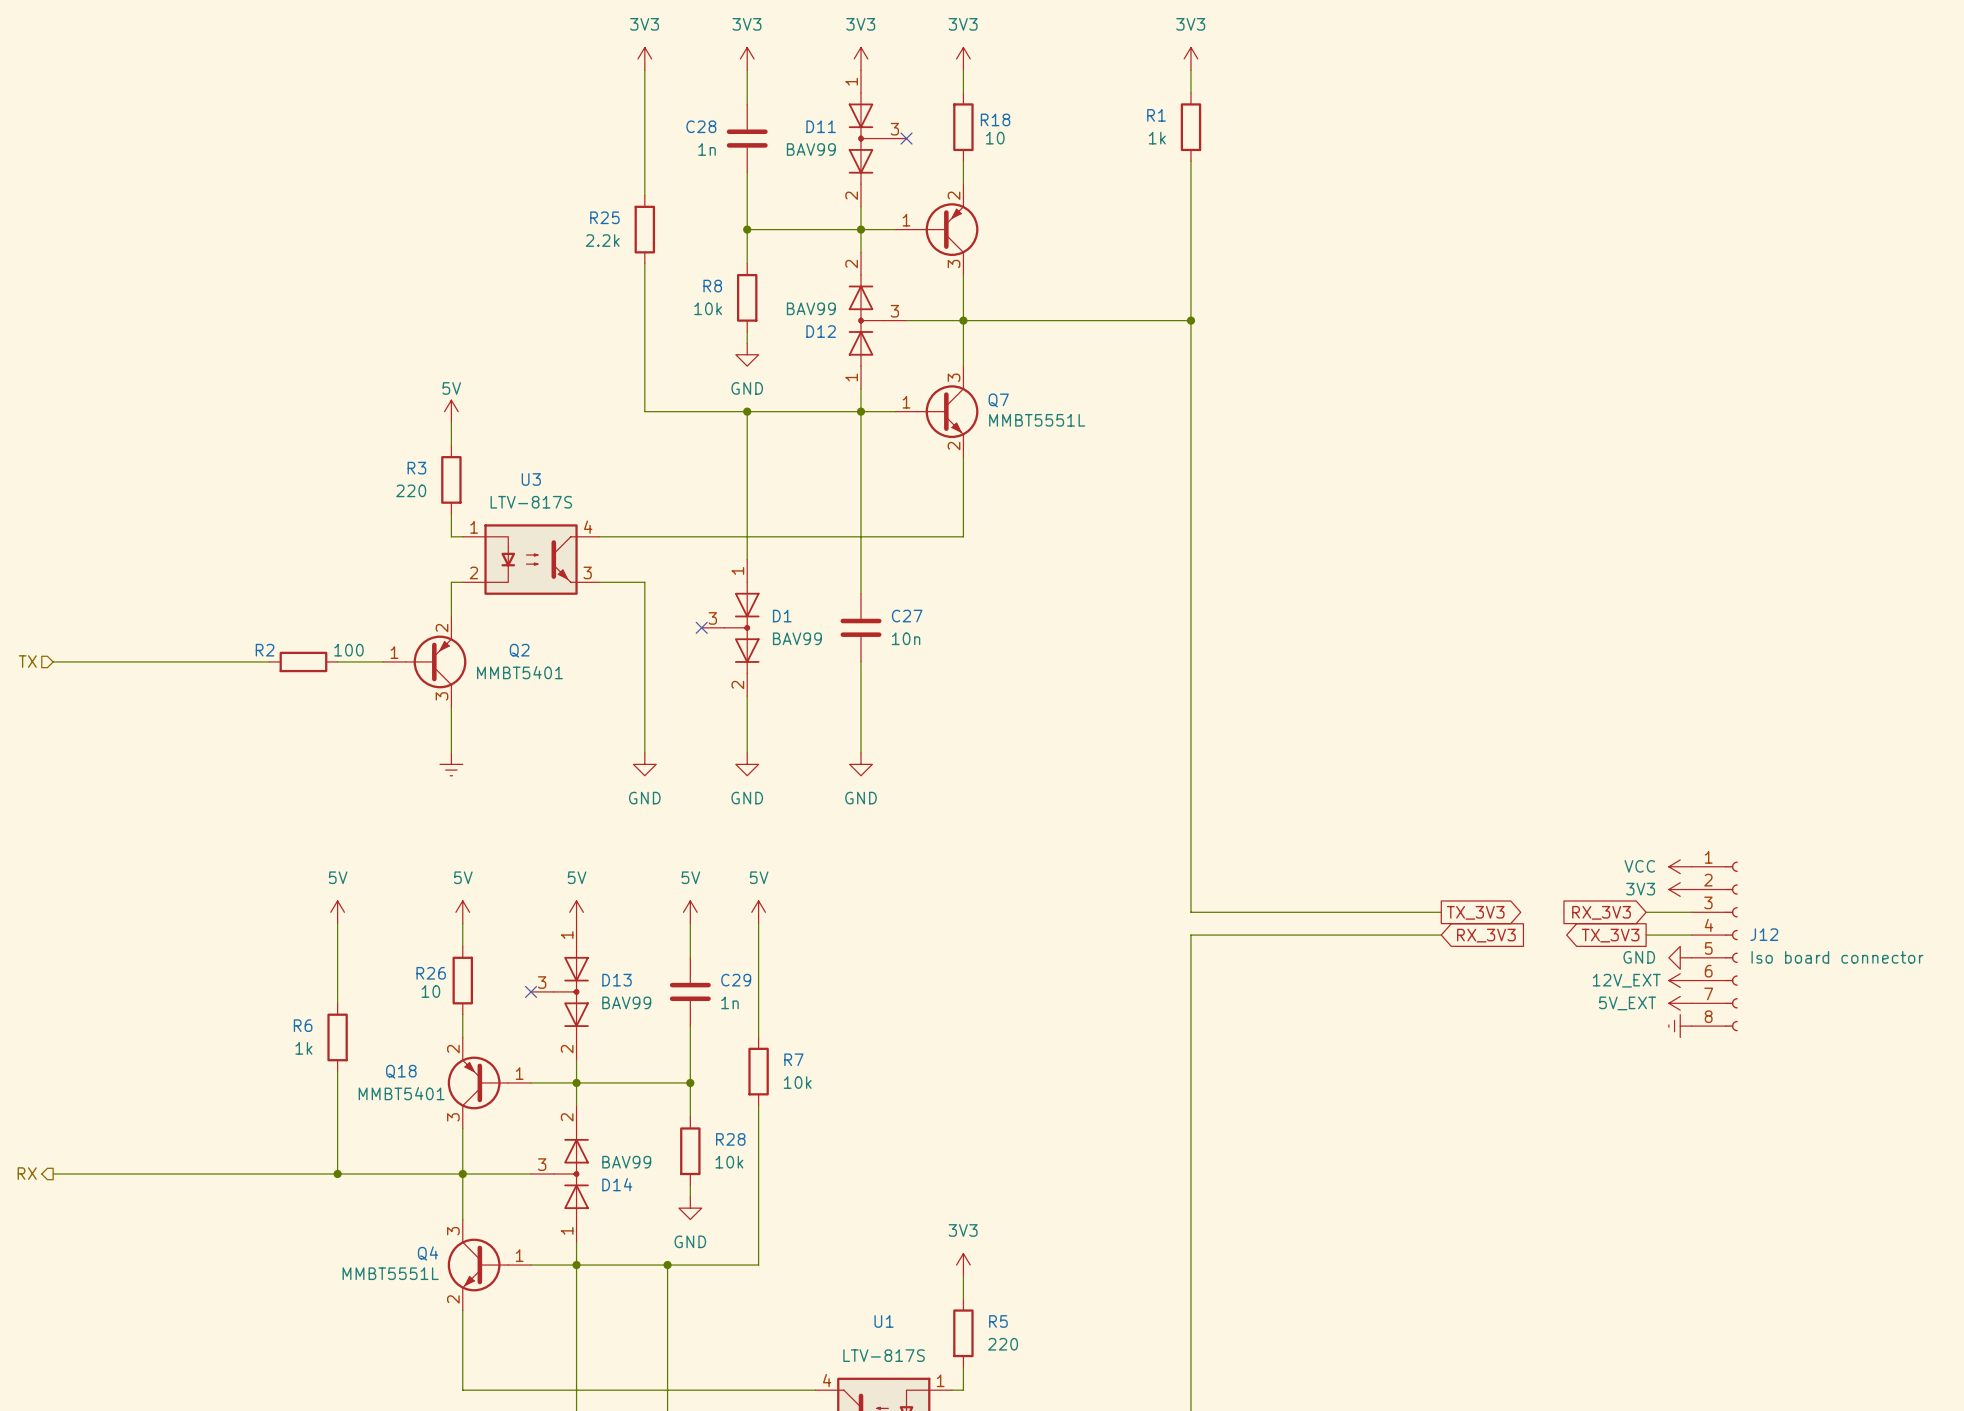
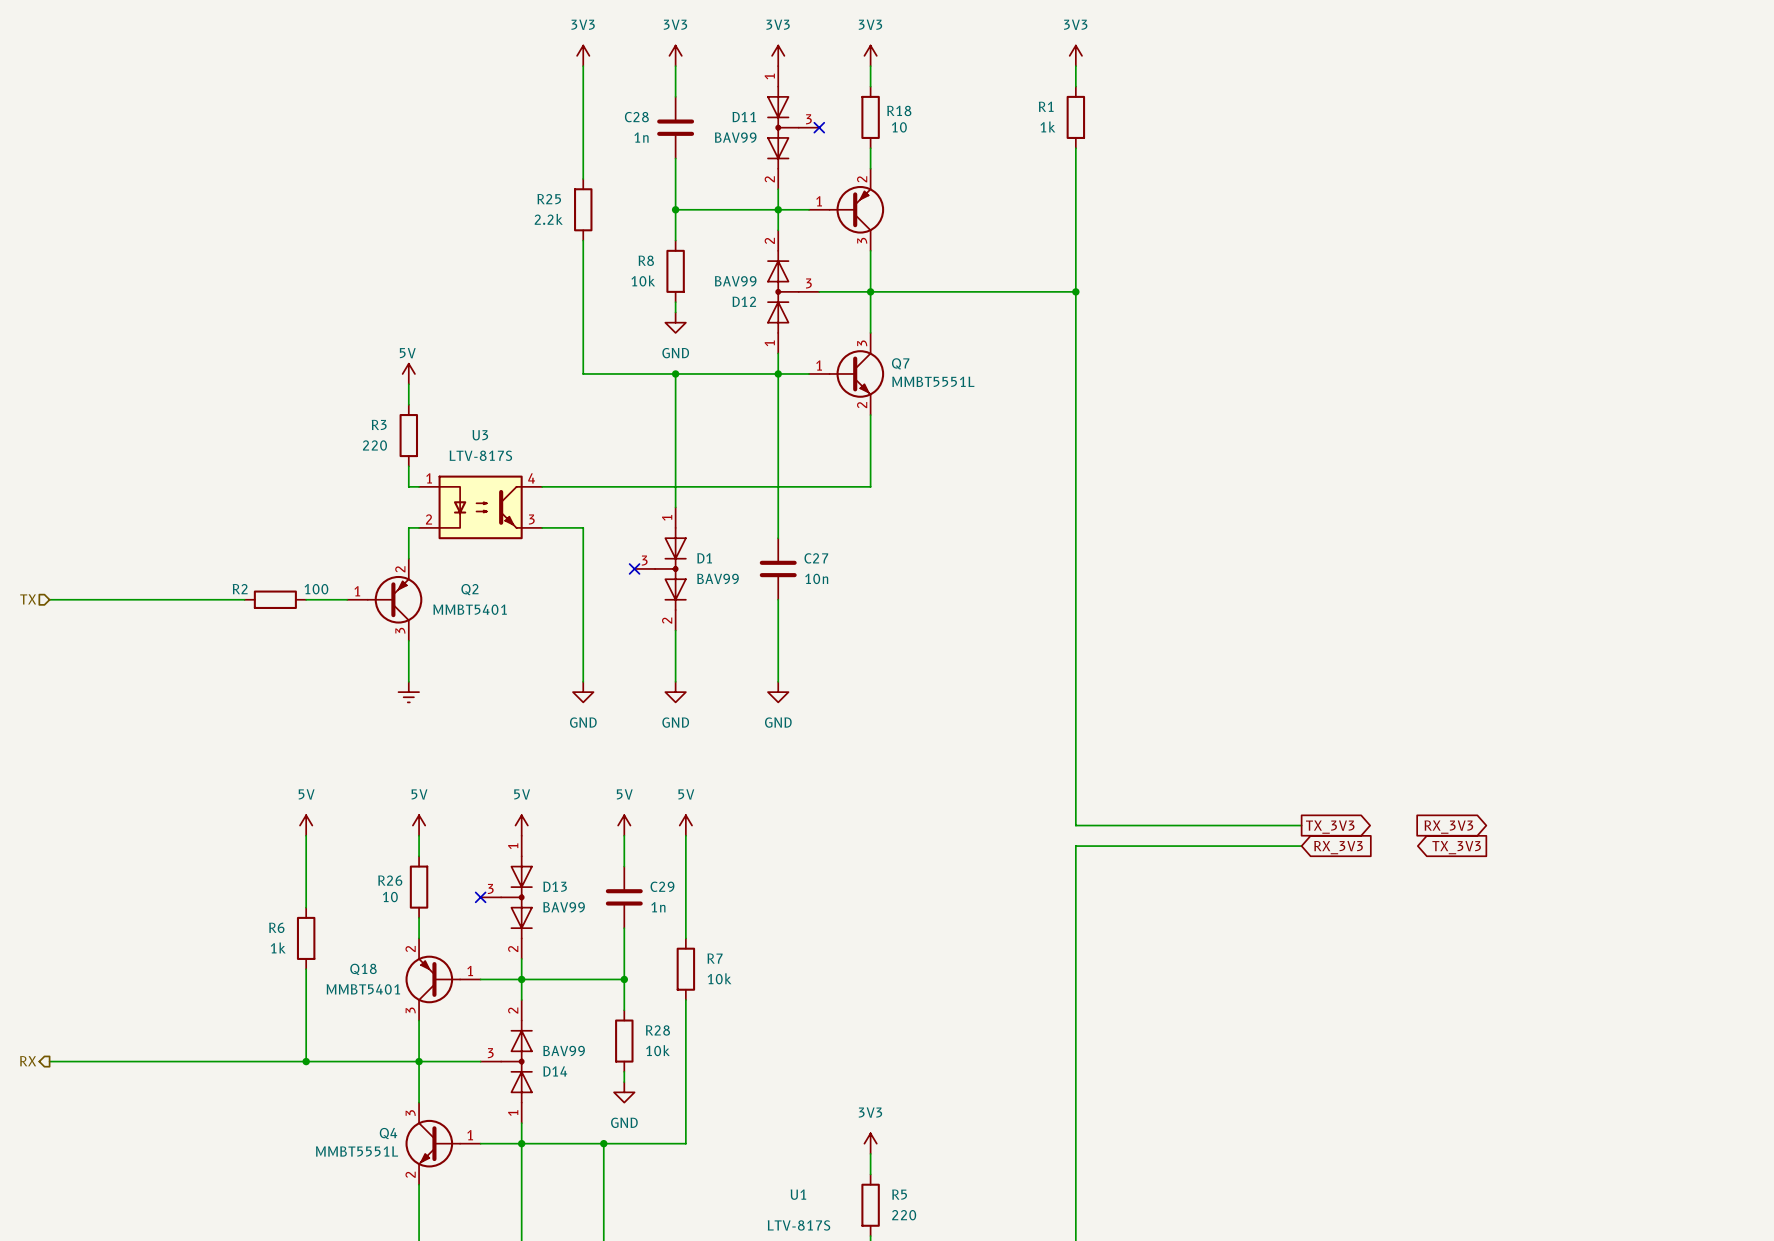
power symbol: VCC (1680, 866) -> none
power symbol: 3V3 (1680, 889) -> none
wire: (1646, 912) (1691, 912) -> none
wire: (1646, 935) (1691, 935) -> none
J12: Iso board connector (1714, 946) -> none
power symbol: GND (1680, 957) -> none
power symbol: 12V_EXT (1680, 980) -> none
power symbol: 5V_EXT (1680, 1003) -> none
power symbol: (1680, 1026) -> none

